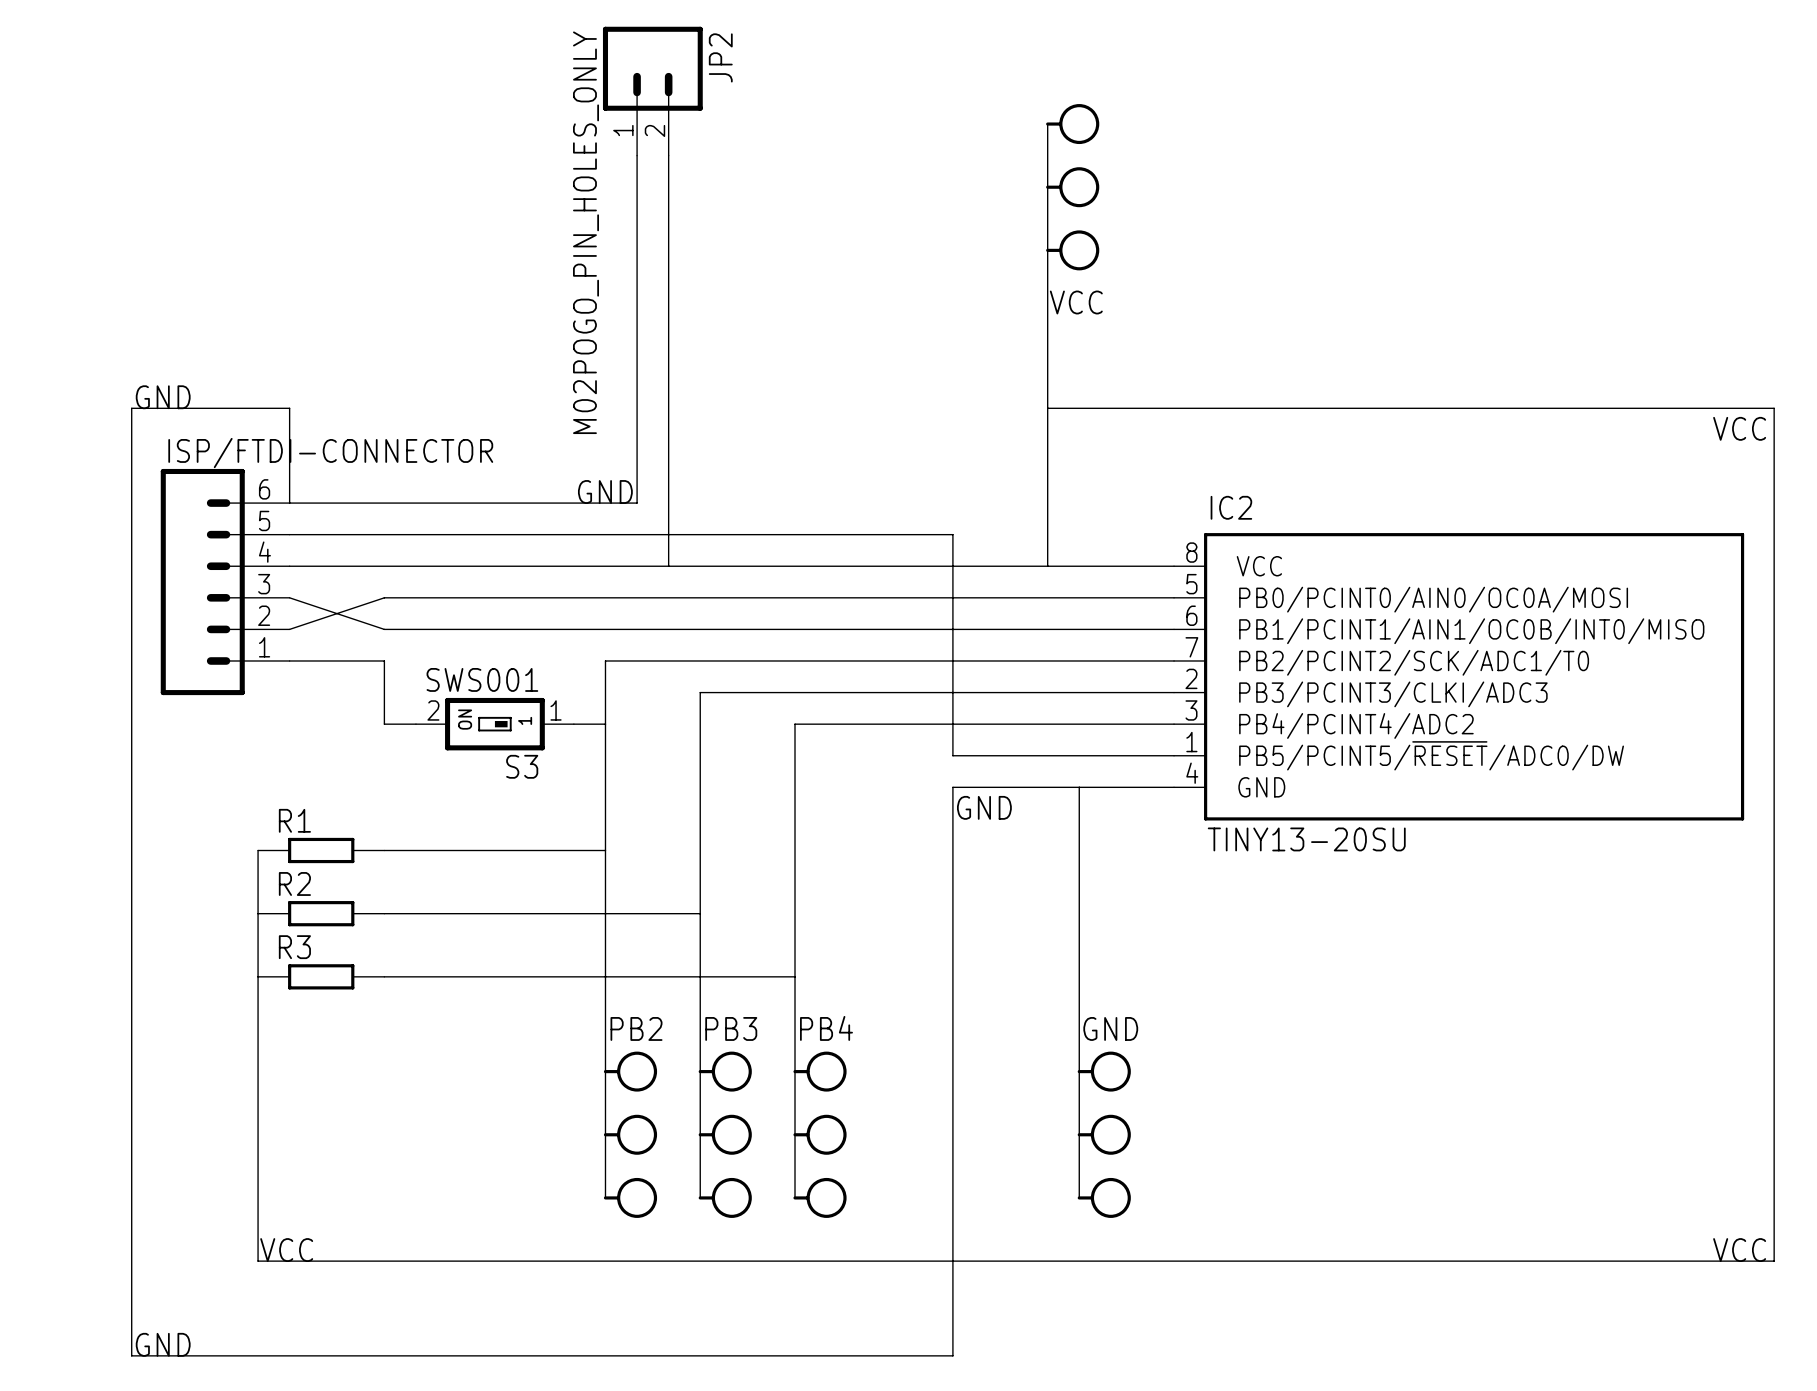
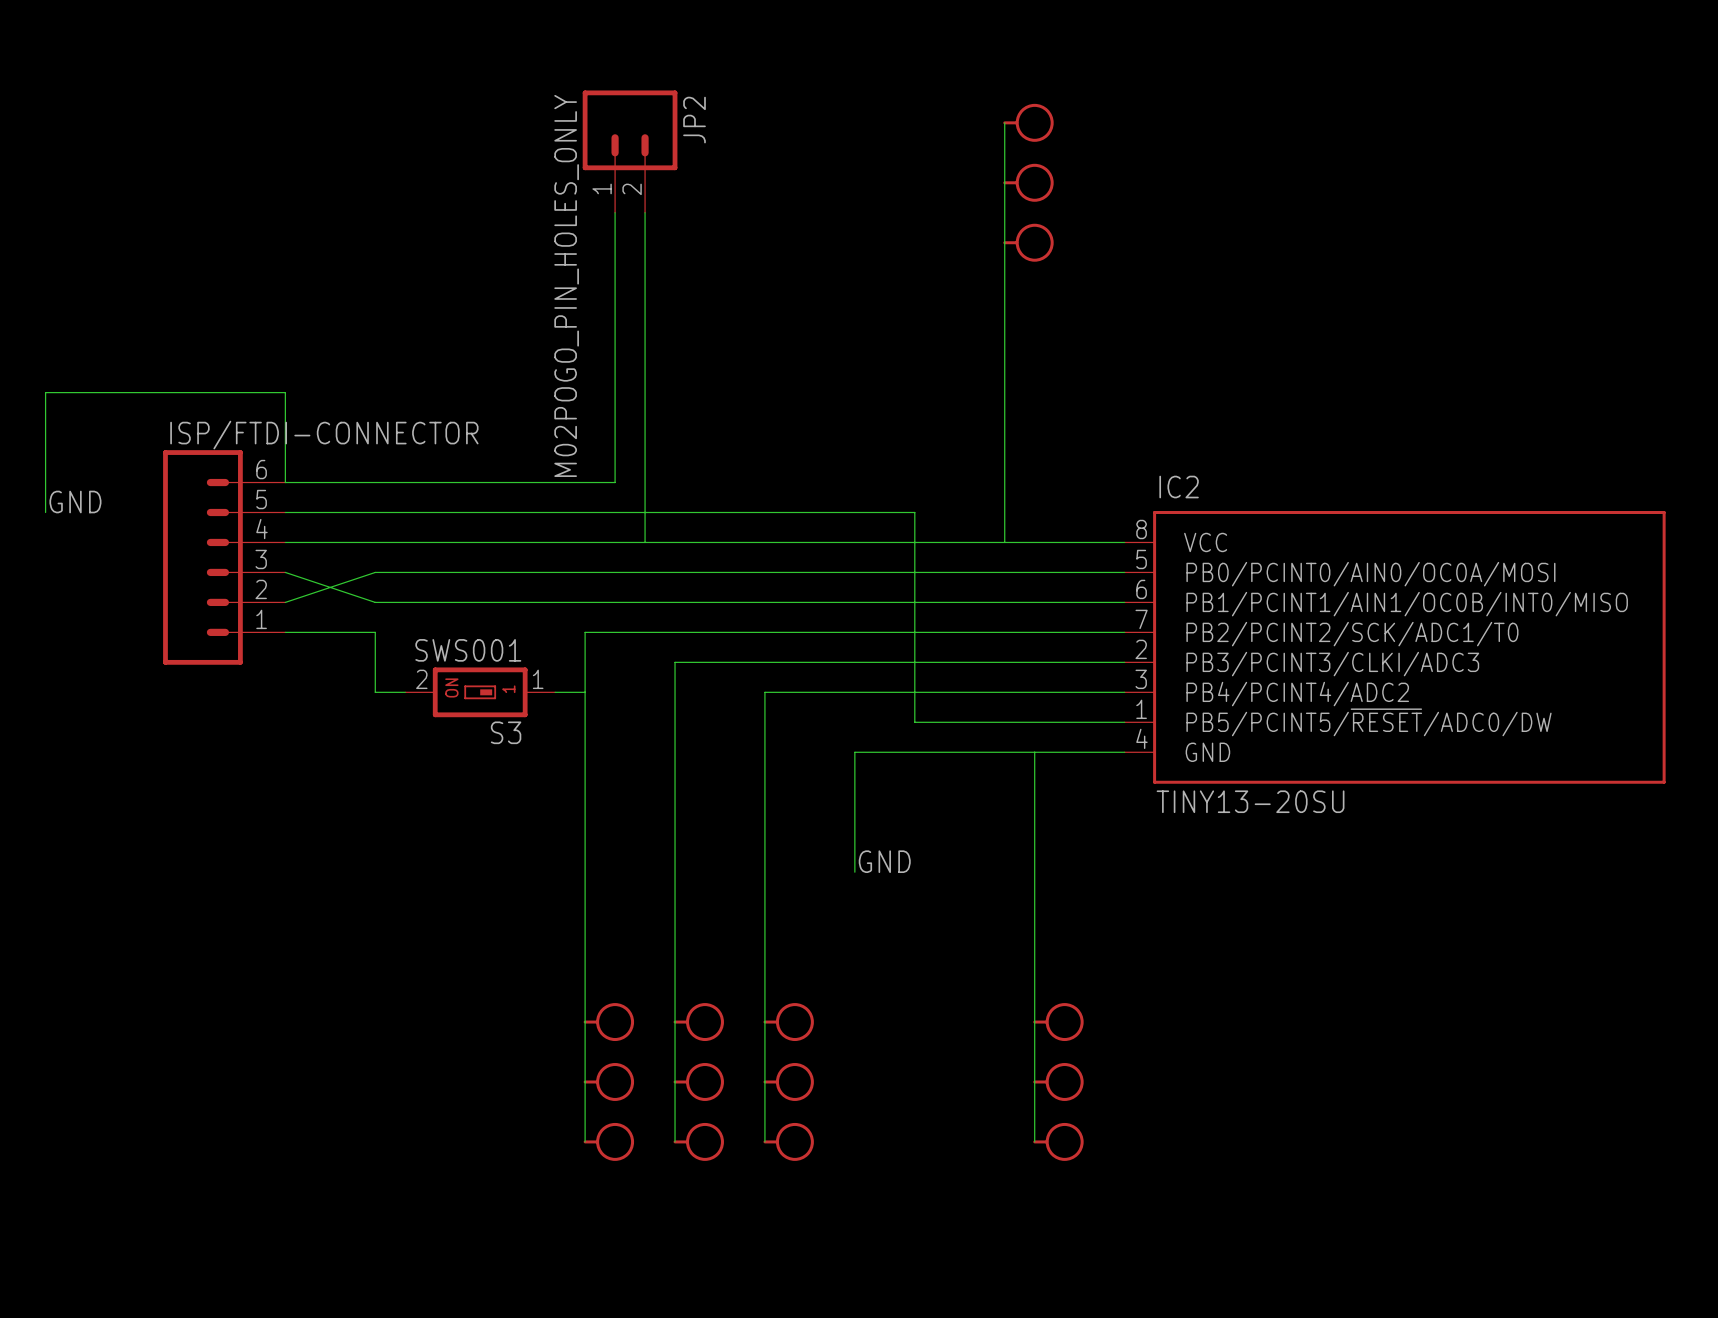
JP2 position: (652, 91) -> (630, 151)
label: VCC (1076, 302) -> none
label position: GND (163, 397) -> GND (75, 502)
wire: (131, 408) (131, 1355) (952, 1355) (952, 787) -> (854, 872) (854, 752) (914, 752)
wire: none -> (135, 392) (45, 392) (45, 512)
wire: (1047, 408) (1774, 408) (1774, 1261) (258, 1261) (258, 850) -> none
label: VCC (1739, 428) -> none
label: GND (605, 492) -> none
label: GND (984, 807) -> none
R1: (321, 850) -> none
wire: (384, 850) (605, 850) -> none
label: none -> GND (884, 861)
R2: (321, 913) -> none
wire: (384, 913) (700, 913) -> none
R3: (321, 976) -> none
wire: (384, 976) (795, 976) -> none
label: PB2 (636, 1028) -> none
label: PB3 (731, 1028) -> none
label: PB4 (826, 1028) -> none
label: GND (1110, 1028) -> none
label: VCC (286, 1250) -> none
label: VCC (1739, 1250) -> none
label: GND (163, 1344) -> none

